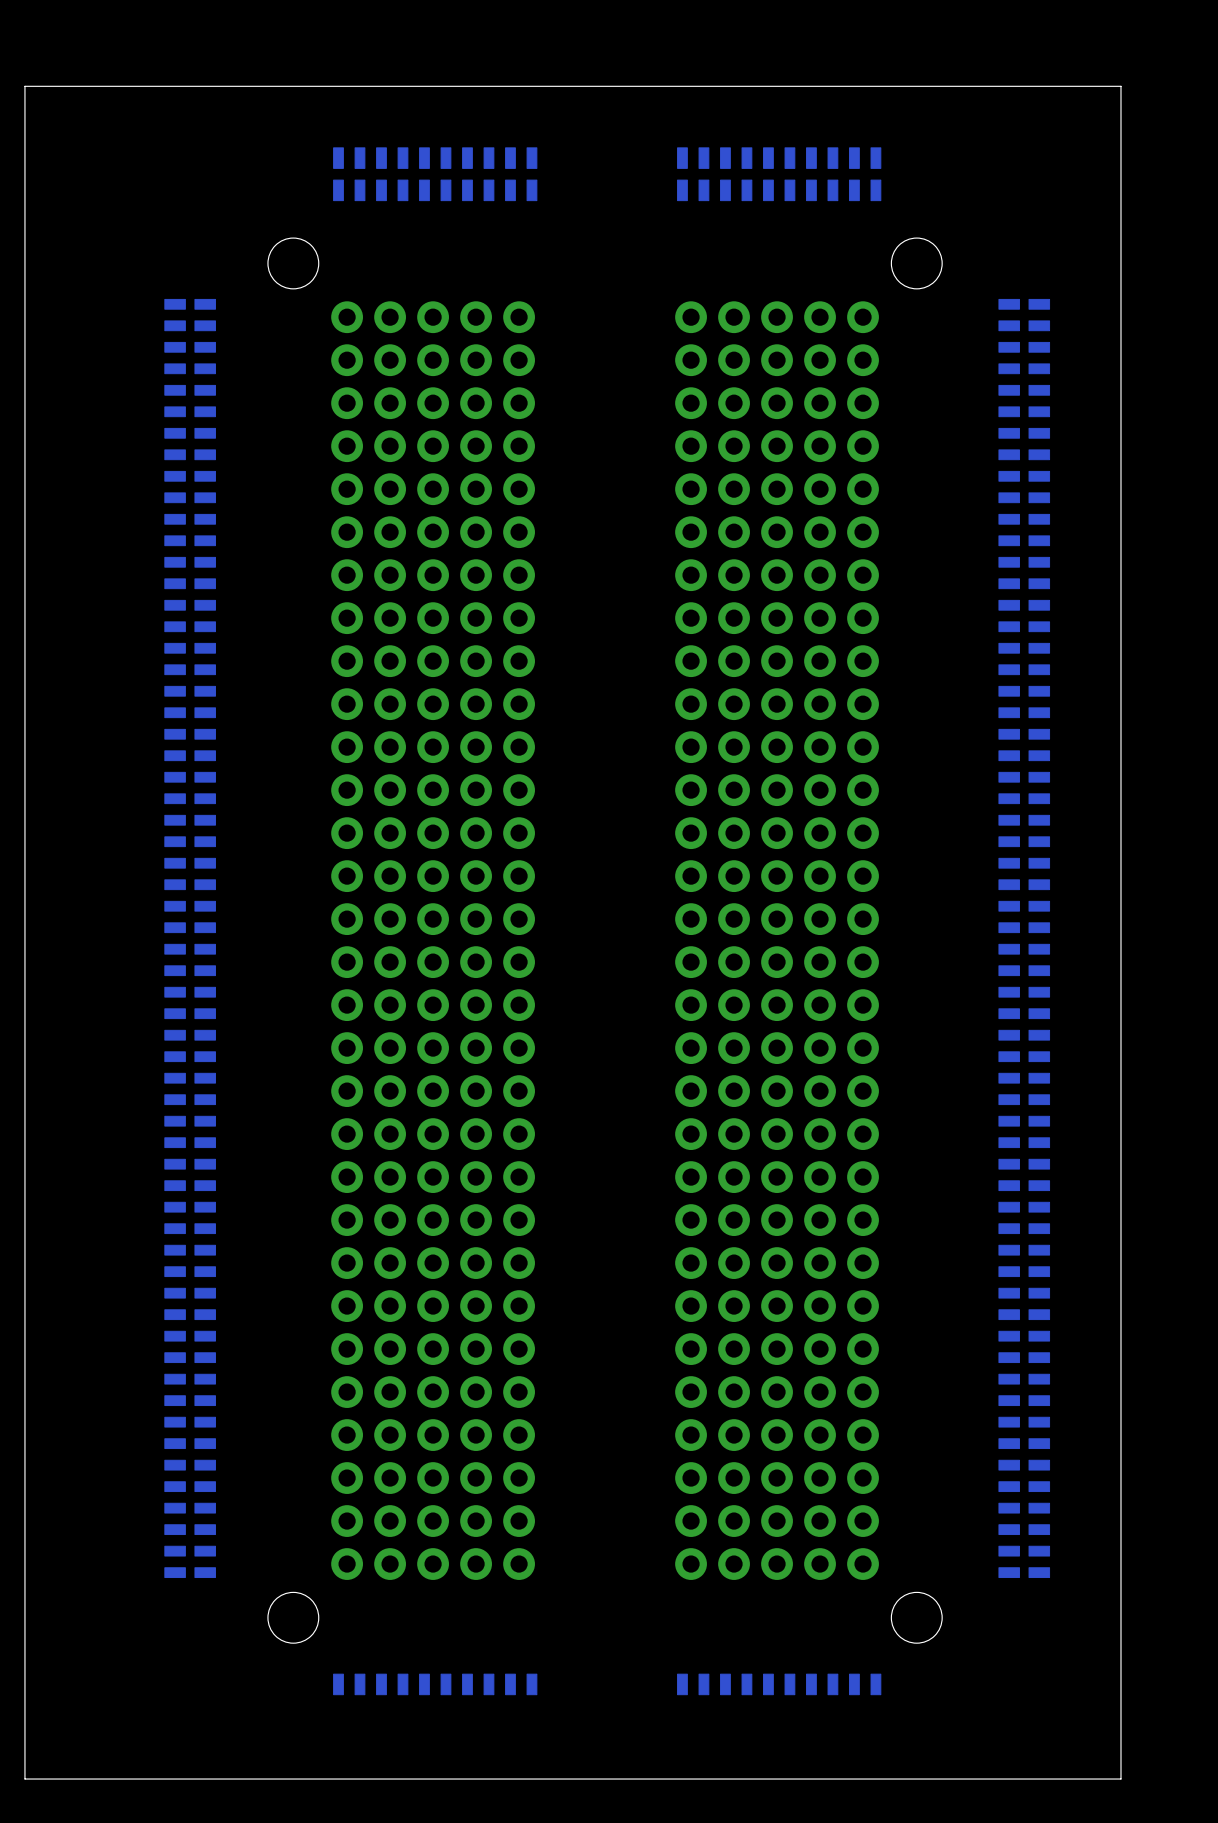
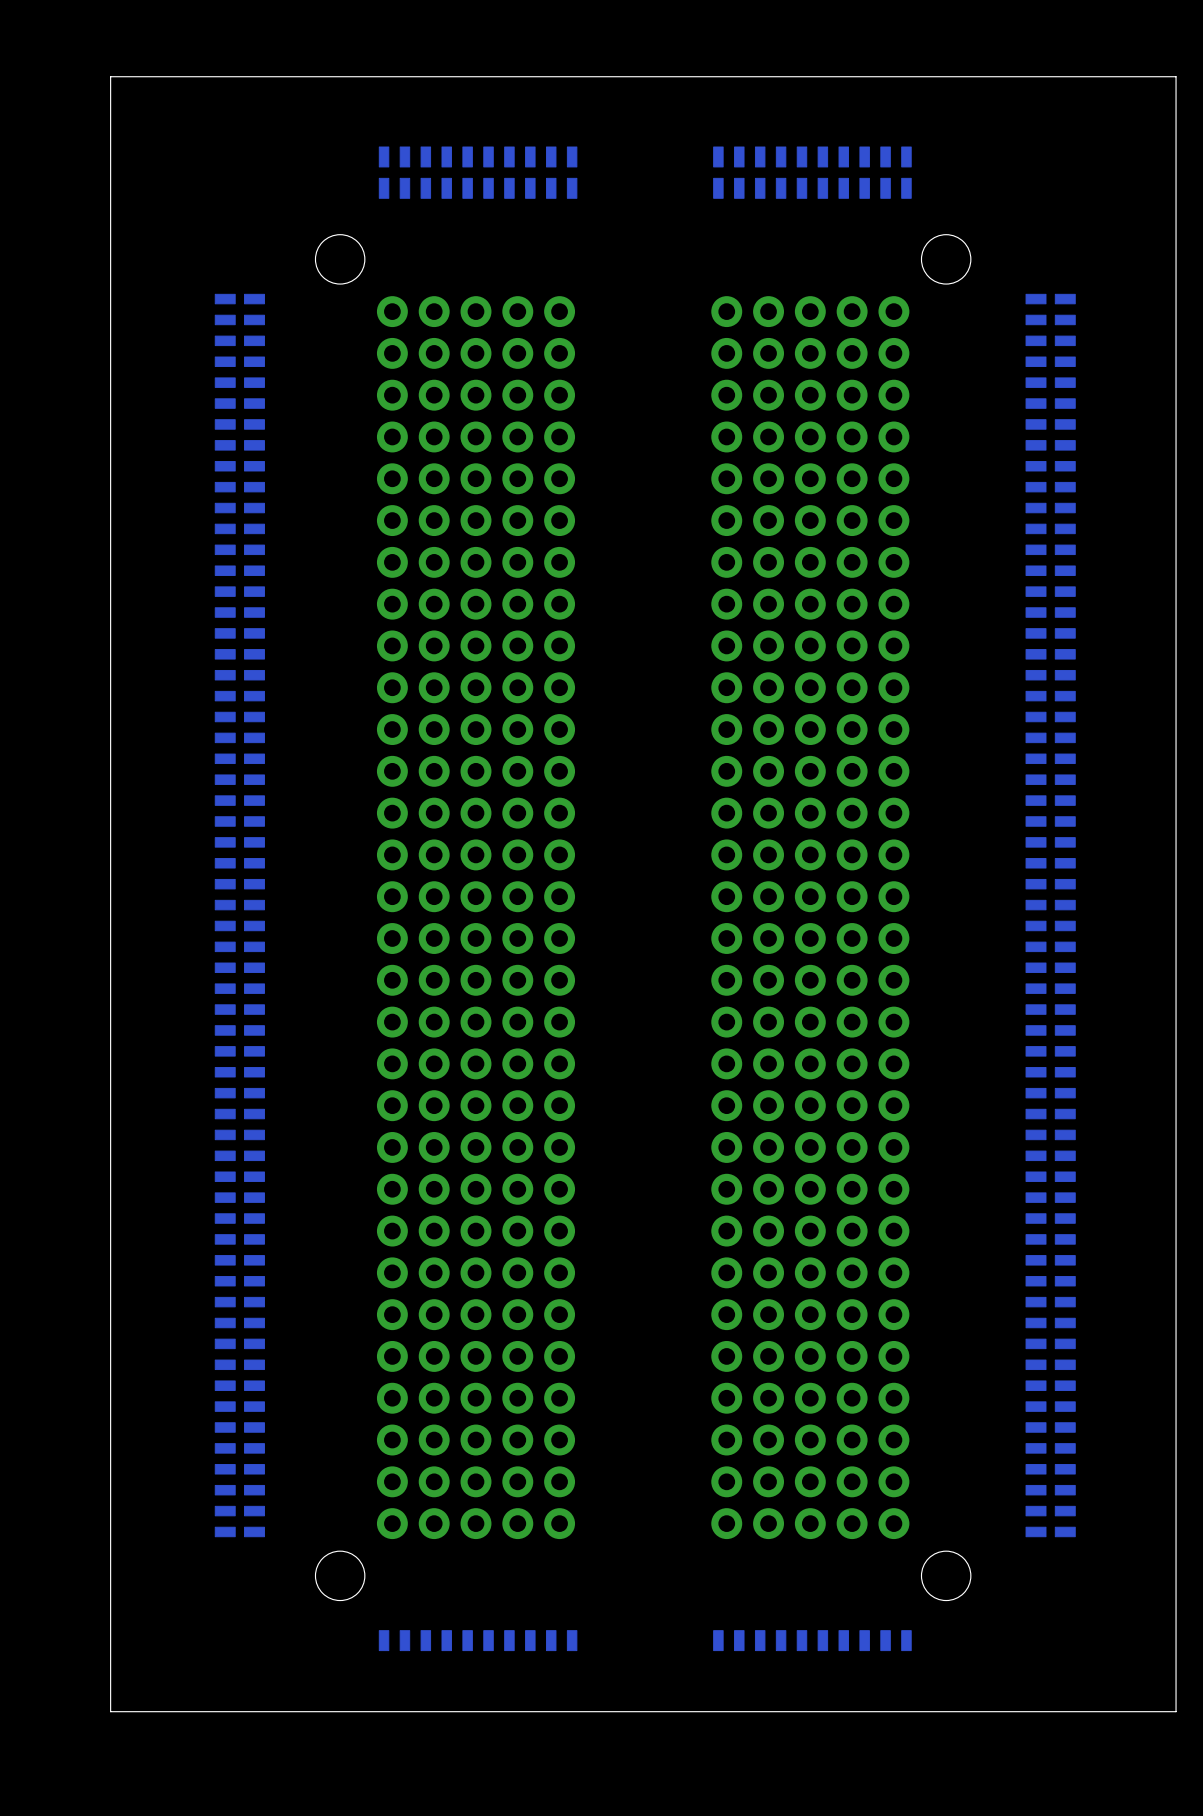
board edge: (1120, 86) (24, 86) (24, 1779) (1120, 1779) (1120, 86) -> (1176, 76) (1176, 1711) (110, 1711) (110, 76) (1176, 76)

